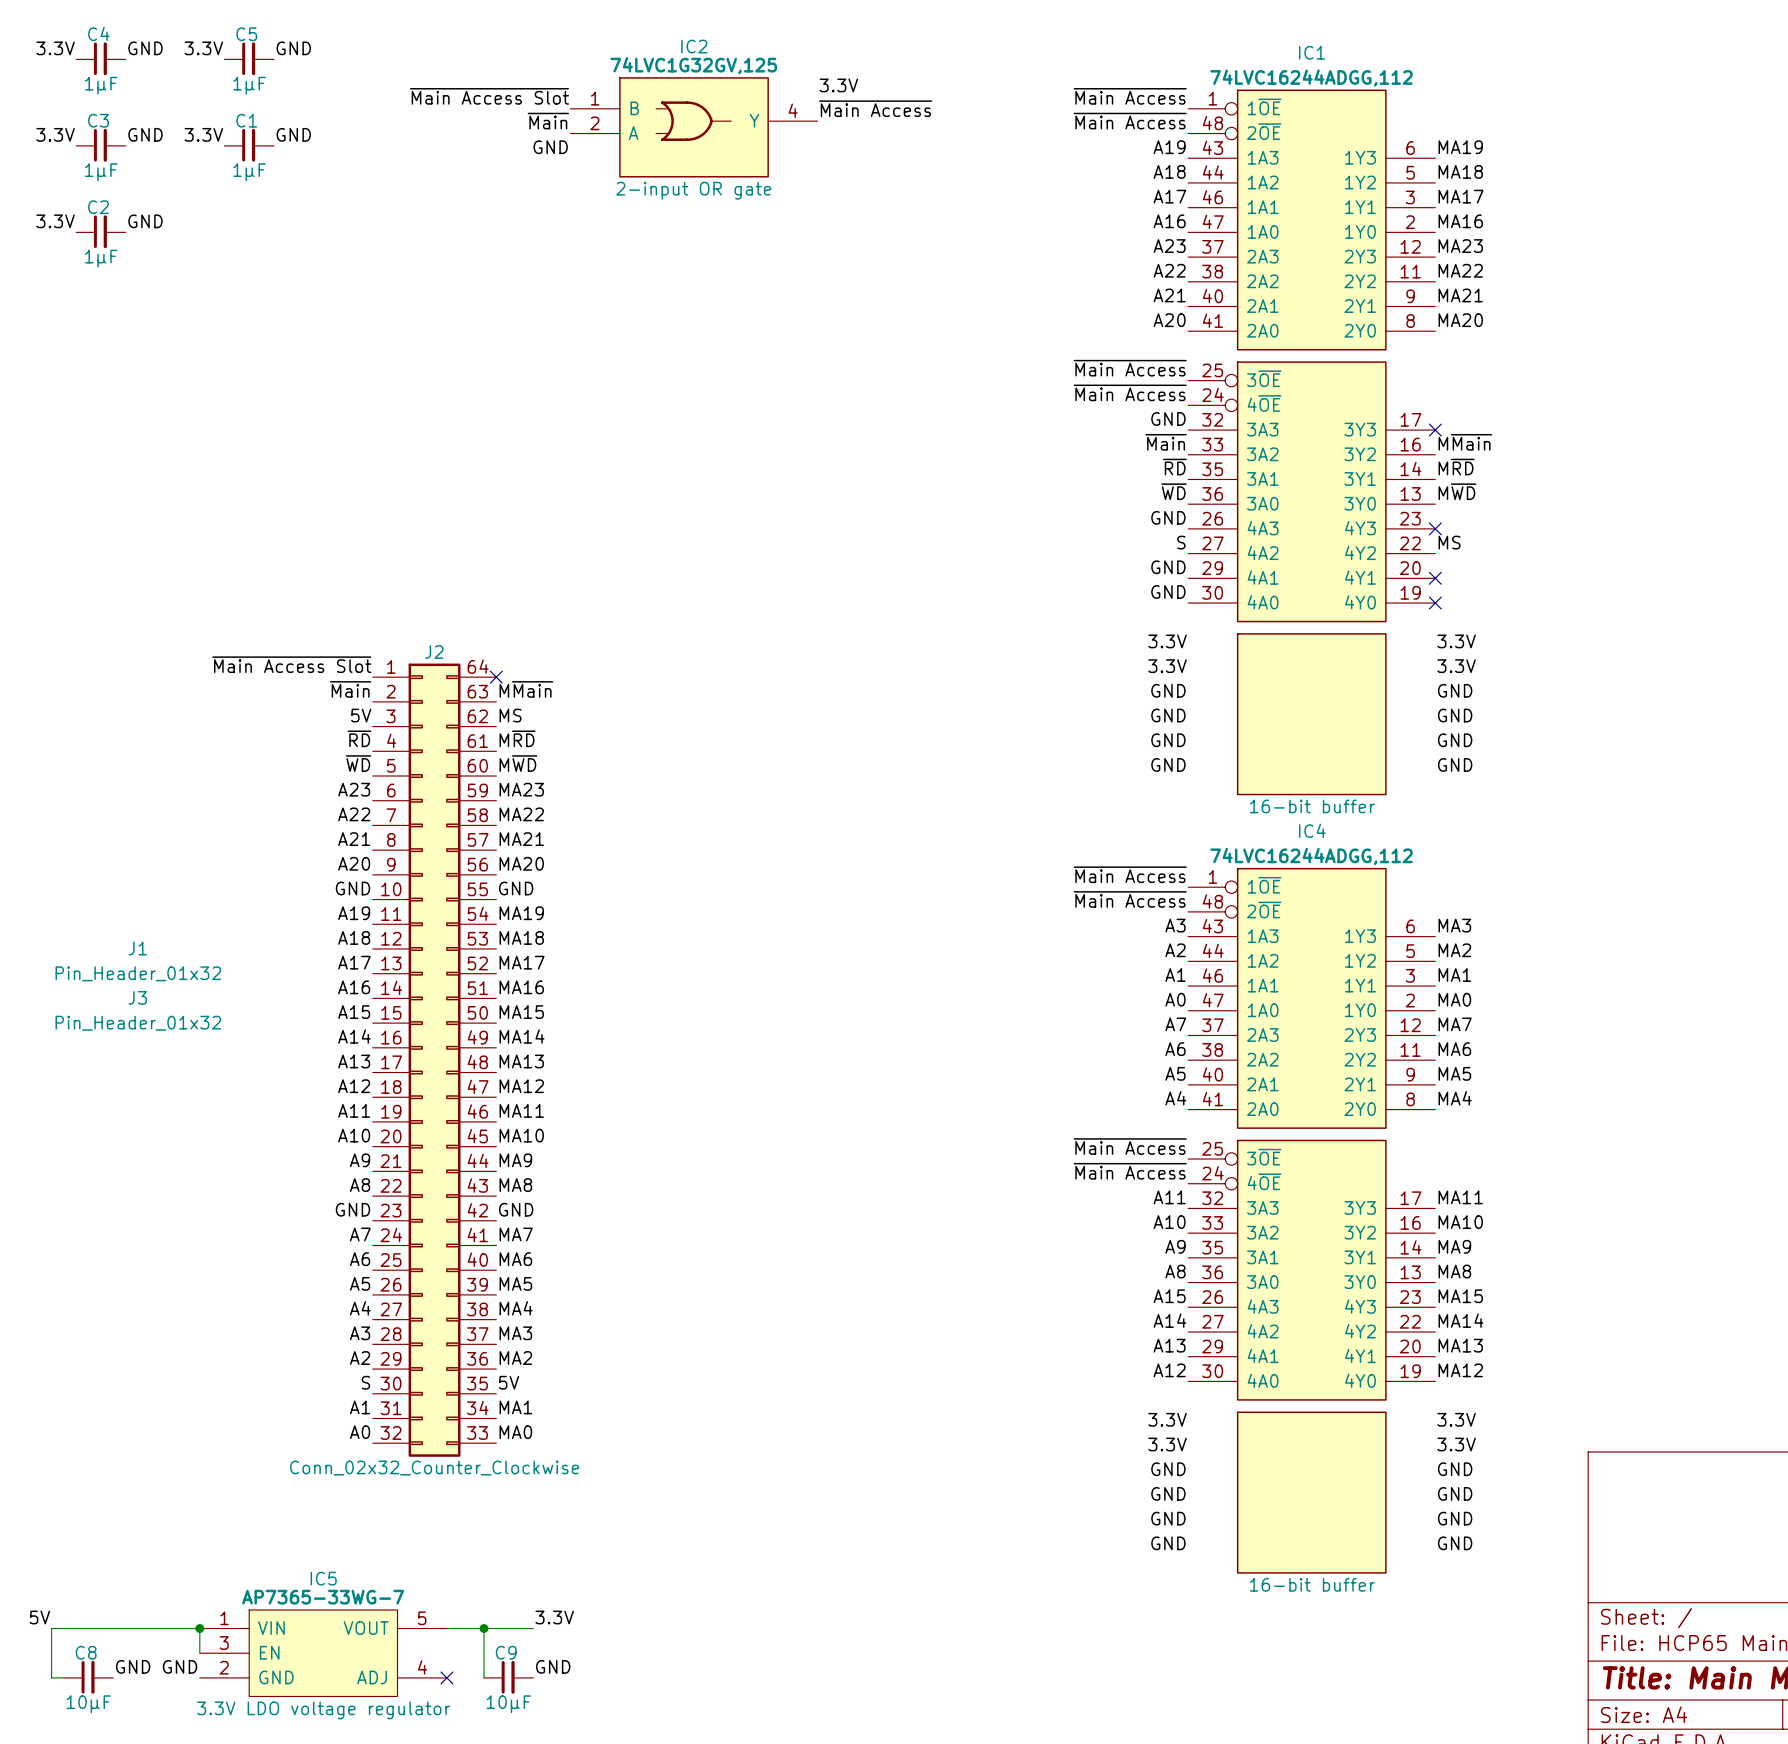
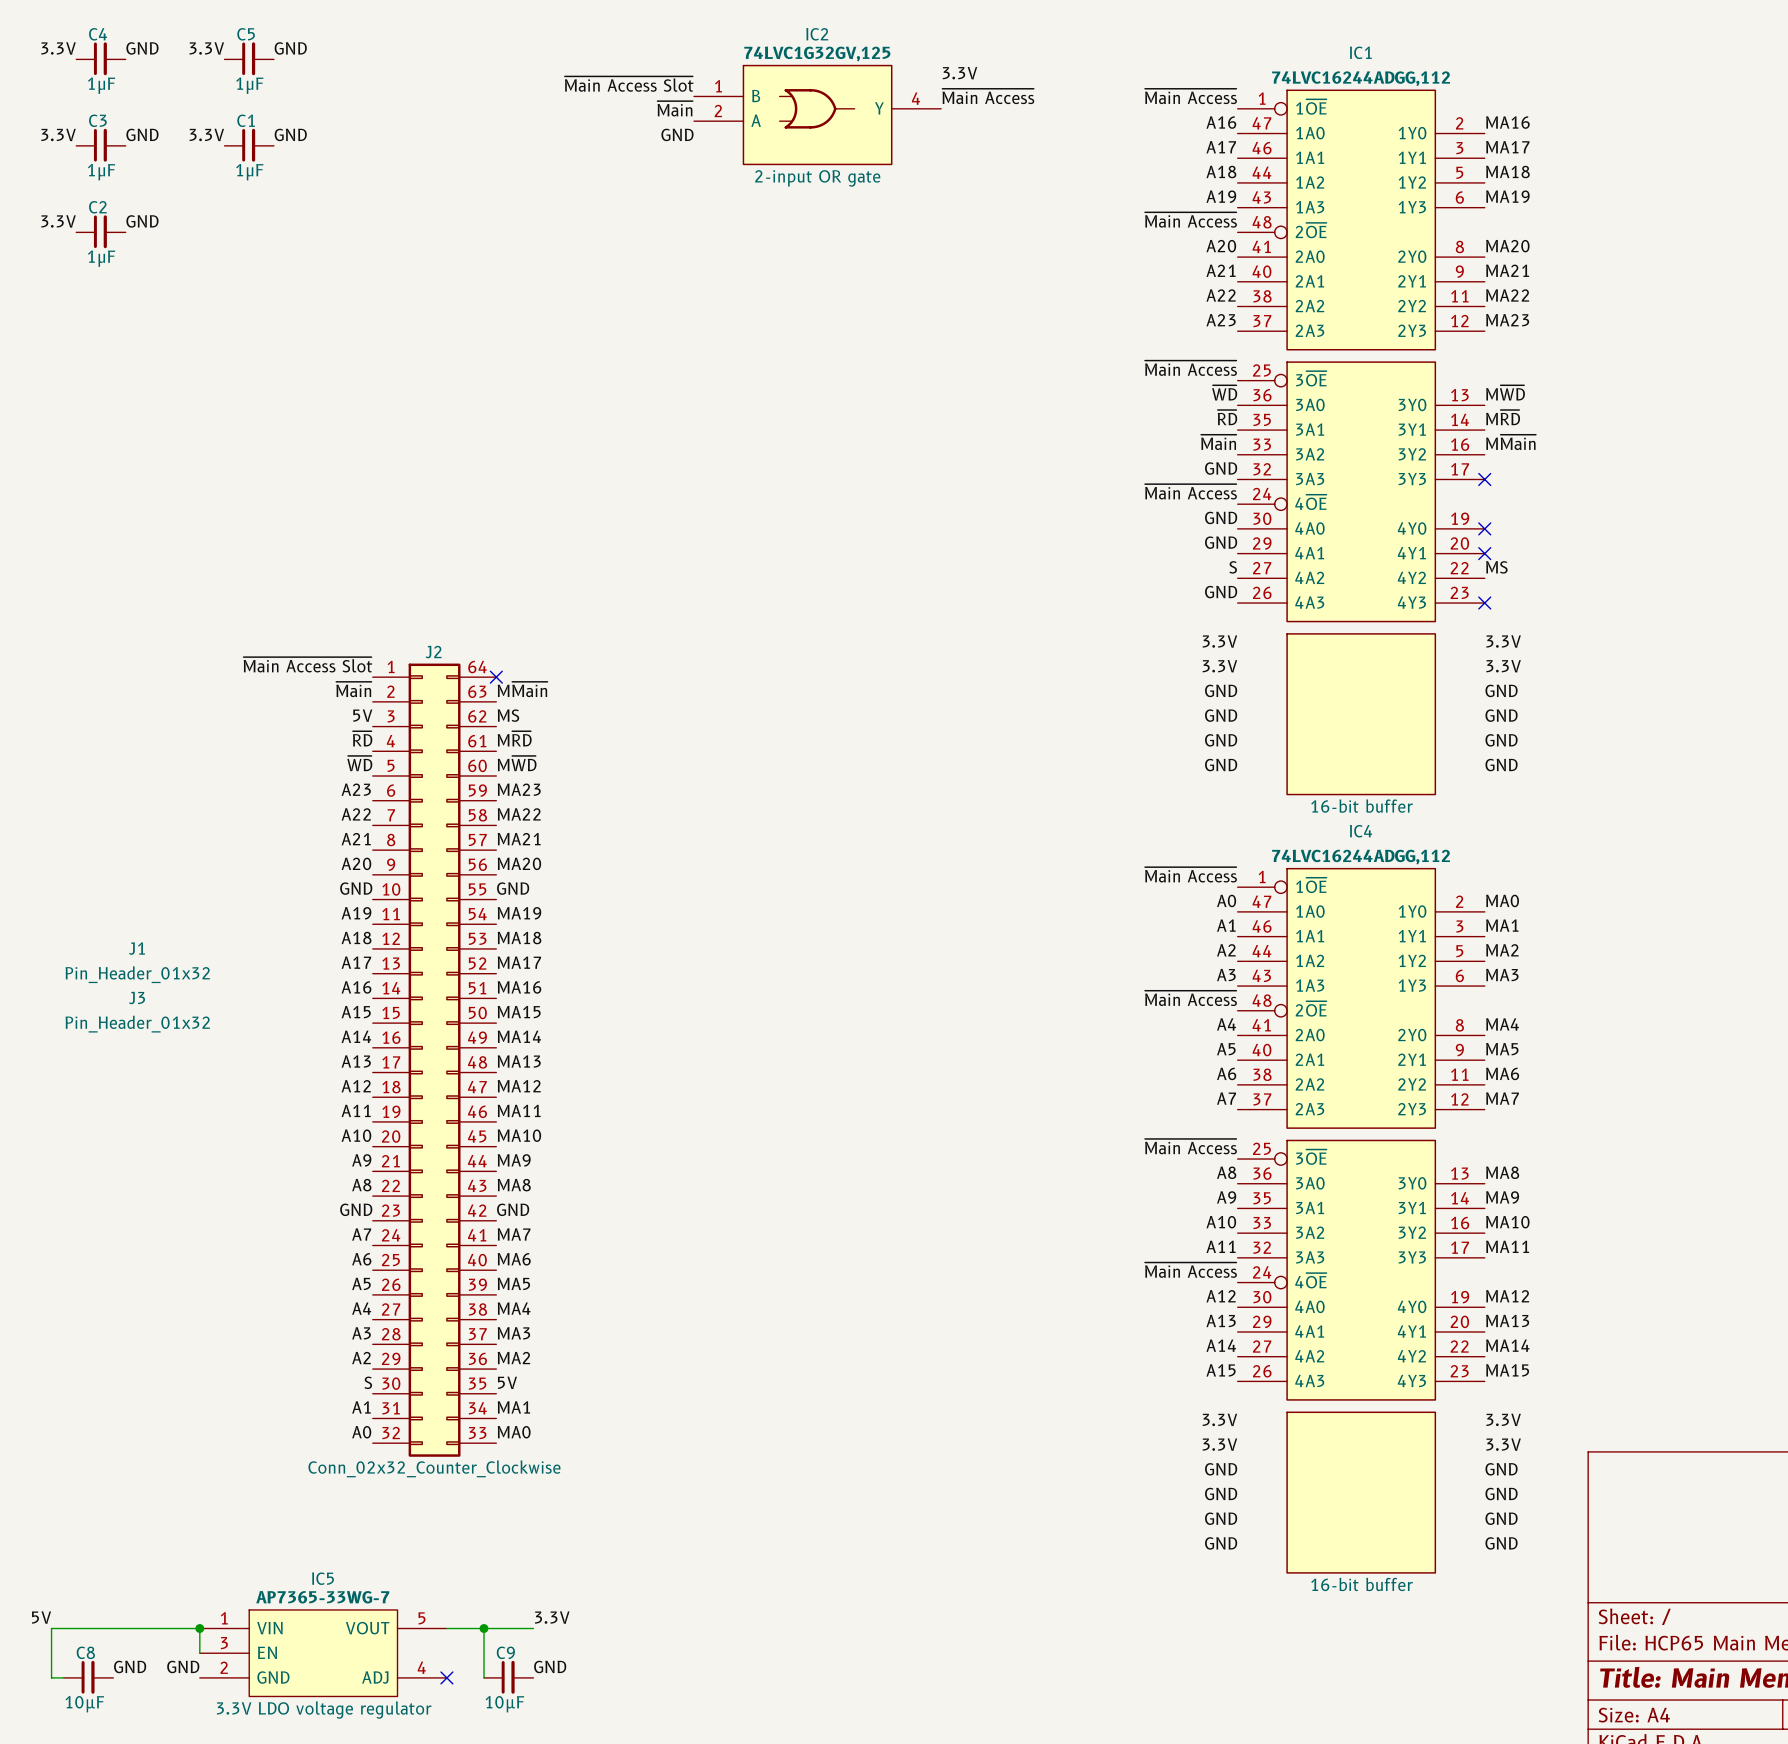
label position: 3.3V (838, 85) -> 3.3V (959, 73)
IC1 symbol: [1188, 89, 1436, 796] -> [1237, 89, 1485, 796]
label position: ~{Main Access Slot} (489, 96) -> ~{Main Access Slot} (629, 84)
label: none -> ~{Main Access} (988, 96)
label: ~{Main Access} (1130, 96) -> none
label: none -> ~{Main Access} (1190, 96)
label: ~{Main Access} (875, 108) -> none
label position: ~{Main} (548, 121) -> ~{Main} (675, 108)
label: ~{Main Access} (1130, 121) -> none
IC2 position: (694, 127) -> (817, 114)
label position: GND (550, 147) -> GND (677, 134)
label position: A19 (1169, 147) -> A19 (1221, 196)
label position: MA19 (1460, 147) -> MA19 (1507, 196)
label position: A18 (1169, 171) -> A18 (1221, 171)
label position: MA18 (1460, 171) -> MA18 (1507, 171)
label position: A17 (1169, 196) -> A17 (1221, 147)
label position: MA17 (1461, 196) -> MA17 (1507, 147)
label: none -> ~{Main Access} (1190, 219)
label position: A16 (1169, 221) -> A16 (1221, 122)
label position: MA16 (1460, 221) -> MA16 (1507, 122)
label position: A23 (1169, 246) -> A23 (1221, 320)
label position: MA23 (1460, 246) -> MA23 (1507, 320)
label position: A22 (1169, 270) -> A22 (1221, 295)
label position: MA22 (1460, 270) -> MA22 (1507, 295)
label position: A21 (1169, 295) -> A21 (1221, 270)
label position: MA21 (1460, 295) -> MA21 (1507, 270)
label position: A20 (1169, 320) -> A20 (1221, 246)
label position: MA20 (1460, 320) -> MA20 (1507, 246)
label: ~{Main Access} (1130, 368) -> none
label: none -> ~{Main Access} (1190, 368)
label: ~{Main Access} (1130, 392) -> none
label: GND (1168, 419) -> none
no-connect mark: (1435, 430) -> none
label position: ~{Main} (1166, 442) -> ~{Main} (1218, 442)
label position: M~{Main} (1465, 442) -> M~{Main} (1511, 442)
label position: ~{RD} (1174, 467) -> ~{RD} (1227, 417)
label position: M~{RD} (1456, 467) -> M~{RD} (1503, 417)
label: none -> GND (1221, 468)
no-connect mark: none -> (1484, 479)
label position: ~{WD} (1174, 491) -> ~{WD} (1224, 392)
label: none -> ~{Main Access} (1190, 491)
label position: M~{WD} (1457, 491) -> M~{WD} (1505, 392)
label: GND (1168, 517) -> none
label: none -> GND (1221, 517)
no-connect mark: (1435, 528) -> none
no-connect mark: none -> (1484, 528)
label position: S (1181, 542) -> S (1233, 567)
label: none -> GND (1221, 542)
label position: MS (1449, 542) -> MS (1496, 567)
no-connect mark: none -> (1484, 553)
label: GND (1168, 567) -> none
no-connect mark: (1435, 578) -> none
label: GND (1168, 592) -> none
label: none -> GND (1221, 592)
no-connect mark: (1435, 603) -> none
no-connect mark: none -> (1484, 603)
label: 3.3V (1167, 641) -> none
label: none -> 3.3V (1219, 641)
label: 3.3V (1456, 641) -> none
label: none -> 3.3V (1503, 641)
label: 3.3V (1167, 666) -> none
label: none -> 3.3V (1219, 666)
label: 3.3V (1456, 666) -> none
label: none -> 3.3V (1503, 666)
label: GND (1168, 690) -> none
label: none -> GND (1221, 690)
label: GND (1455, 690) -> none
label: none -> GND (1501, 690)
label: GND (1168, 715) -> none
label: none -> GND (1221, 715)
label: GND (1455, 715) -> none
label: none -> GND (1501, 715)
label: GND (1168, 740) -> none
label: none -> GND (1221, 740)
label: GND (1455, 740) -> none
label: none -> GND (1501, 740)
label: GND (1168, 764) -> none
label: none -> GND (1221, 765)
label: GND (1455, 764) -> none
label: none -> GND (1501, 765)
IC4 symbol: [1188, 867, 1436, 1574] -> [1237, 867, 1485, 1574]
label: ~{Main Access} (1130, 874) -> none
label: none -> ~{Main Access} (1190, 874)
label: ~{Main Access} (1130, 899) -> none
label position: A3 (1175, 925) -> A3 (1226, 975)
label position: MA3 (1454, 925) -> MA3 (1502, 975)
label position: A2 (1175, 950) -> A2 (1226, 950)
label position: MA2 (1454, 950) -> MA2 (1502, 950)
label position: A1 (1175, 975) -> A1 (1226, 925)
label position: MA1 (1454, 975) -> MA1 (1502, 925)
label: none -> ~{Main Access} (1190, 998)
label position: A0 (1175, 999) -> A0 (1226, 900)
label position: MA0 (1454, 999) -> MA0 (1502, 900)
label position: A7 (1175, 1024) -> A7 (1226, 1098)
label position: MA7 (1455, 1024) -> MA7 (1502, 1098)
label position: A6 (1175, 1049) -> A6 (1226, 1073)
label position: MA6 (1454, 1049) -> MA6 (1502, 1073)
label position: A5 (1175, 1073) -> A5 (1226, 1049)
label position: MA5 (1454, 1073) -> MA5 (1502, 1049)
label position: A4 (1175, 1098) -> A4 (1226, 1024)
label position: MA4 (1455, 1098) -> MA4 (1502, 1024)
label: ~{Main Access} (1130, 1146) -> none
label: none -> ~{Main Access} (1190, 1146)
label: ~{Main Access} (1130, 1171) -> none
label position: A11 (1169, 1197) -> A11 (1221, 1246)
label position: MA11 (1460, 1197) -> MA11 (1507, 1246)
label position: A10 (1169, 1222) -> A10 (1221, 1222)
label position: MA10 (1460, 1222) -> MA10 (1507, 1222)
label position: A9 (1175, 1246) -> A9 (1226, 1197)
label position: MA9 (1454, 1246) -> MA9 (1502, 1197)
label: none -> ~{Main Access} (1190, 1270)
label position: A8 (1175, 1271) -> A8 (1226, 1172)
label position: MA8 (1454, 1271) -> MA8 (1502, 1172)
label position: A15 (1169, 1296) -> A15 (1221, 1370)
label position: MA15 (1460, 1296) -> MA15 (1507, 1370)
label position: A14 (1169, 1320) -> A14 (1221, 1345)
label position: MA14 (1461, 1320) -> MA14 (1507, 1345)
label position: A13 (1169, 1345) -> A13 (1221, 1320)
label position: MA13 (1460, 1345) -> MA13 (1507, 1320)
label position: A12 (1169, 1370) -> A12 (1221, 1296)
label position: MA12 (1460, 1370) -> MA12 (1507, 1296)
label: 3.3V (1167, 1419) -> none
label: none -> 3.3V (1219, 1419)
label: 3.3V (1456, 1419) -> none
label: none -> 3.3V (1503, 1419)
label: 3.3V (1167, 1444) -> none
label: none -> 3.3V (1219, 1444)
label: 3.3V (1456, 1444) -> none
label: none -> 3.3V (1503, 1444)
label: GND (1168, 1469) -> none
label: none -> GND (1221, 1469)
label: GND (1455, 1469) -> none
label: none -> GND (1501, 1469)
label: GND (1168, 1493) -> none
label: none -> GND (1221, 1494)
label: GND (1455, 1493) -> none
label: none -> GND (1501, 1494)
label: GND (1168, 1518) -> none
label: none -> GND (1221, 1518)
label: GND (1455, 1518) -> none
label: none -> GND (1501, 1518)
label: GND (1168, 1543) -> none
label: none -> GND (1221, 1543)
label: GND (1455, 1543) -> none
label: none -> GND (1501, 1543)

